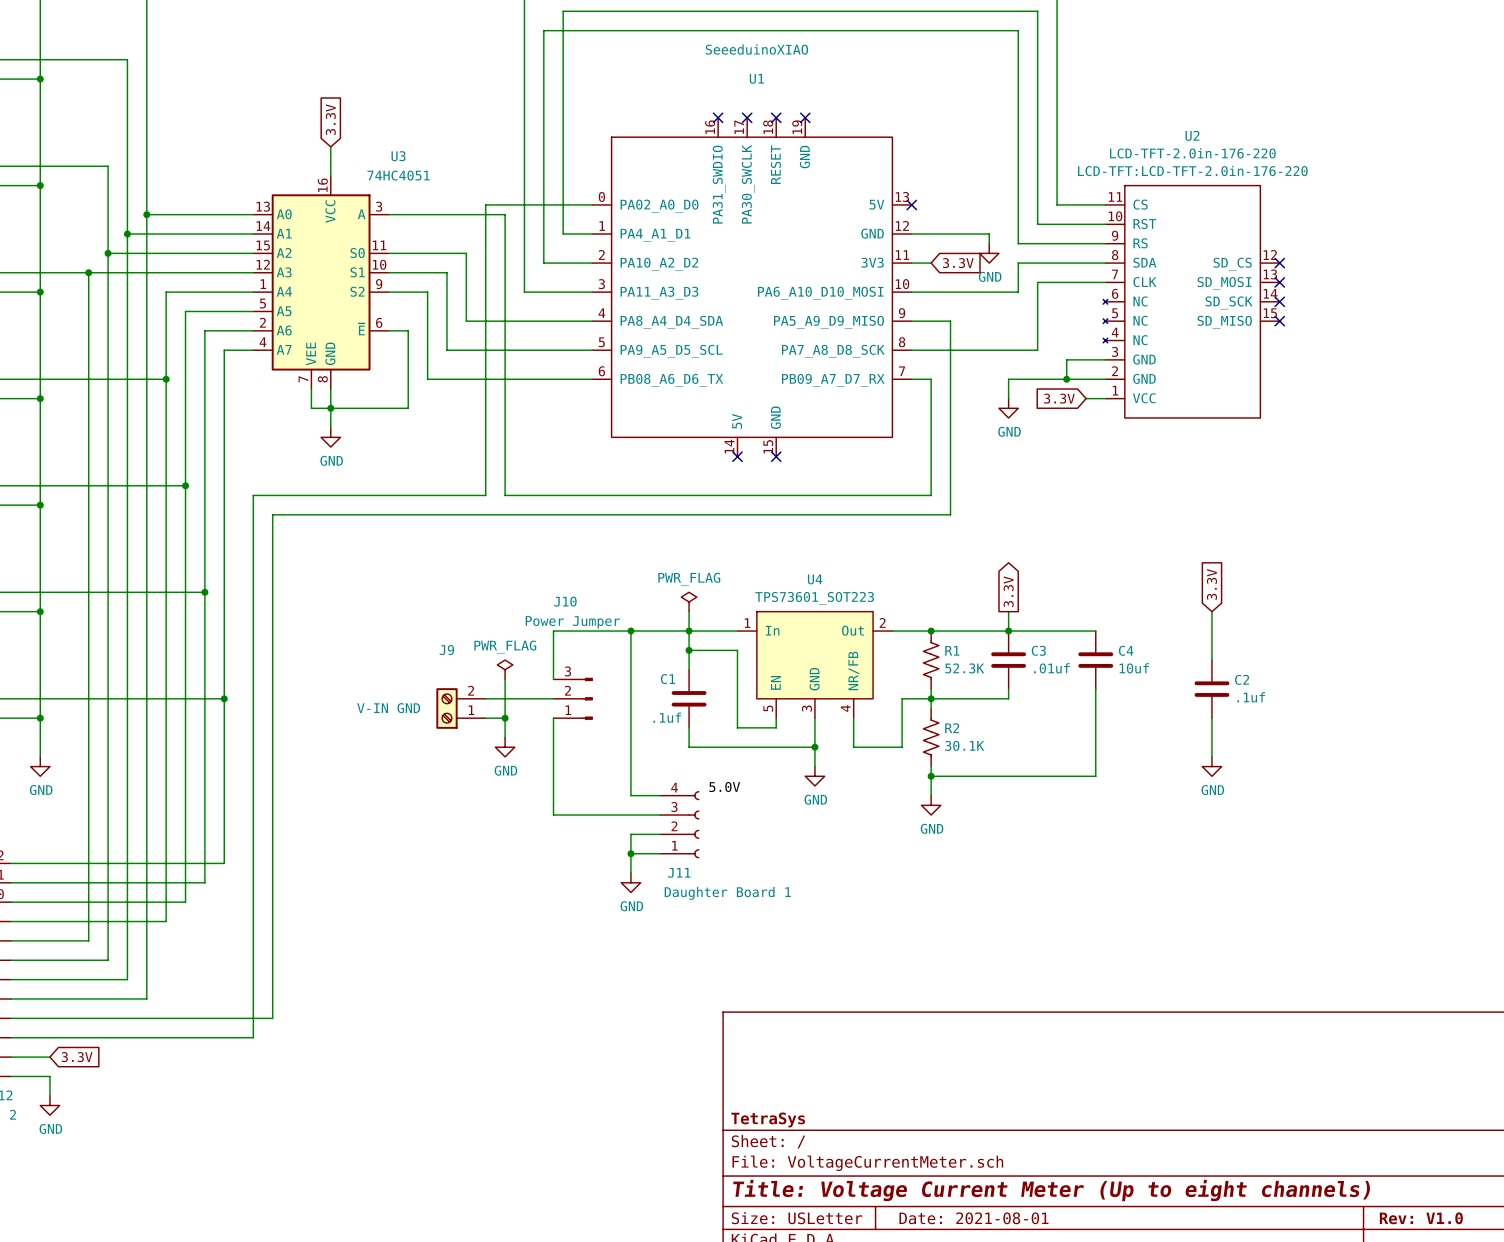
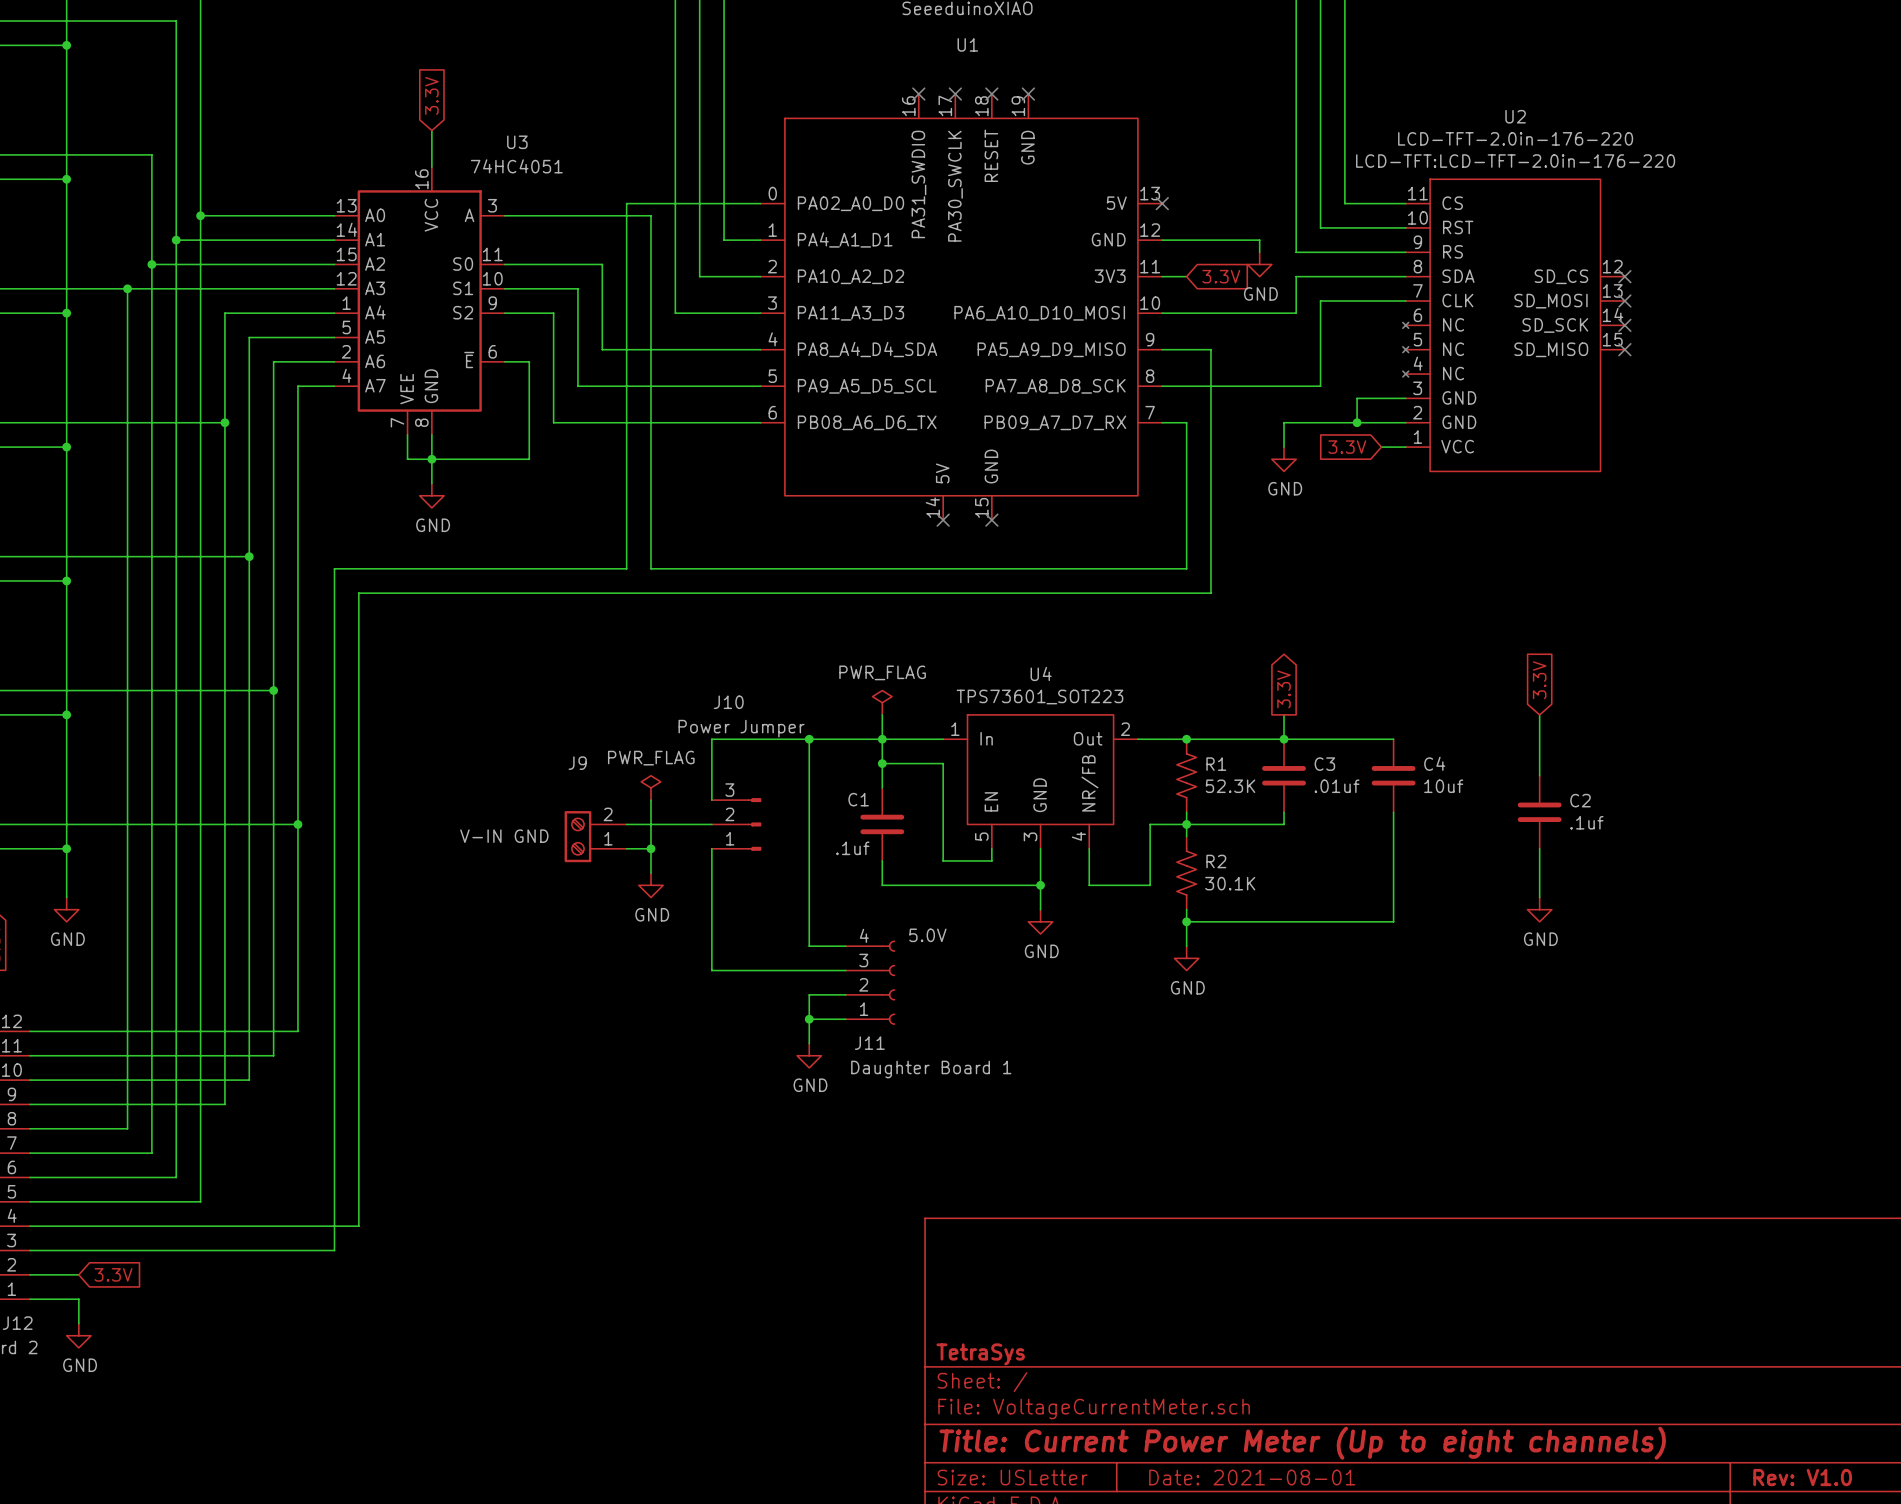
title block: Title: Voltage Current Meter (Up to eight channels) (1051, 1190) -> Title: Current Power Meter (Up to eight channels) (1302, 1443)

